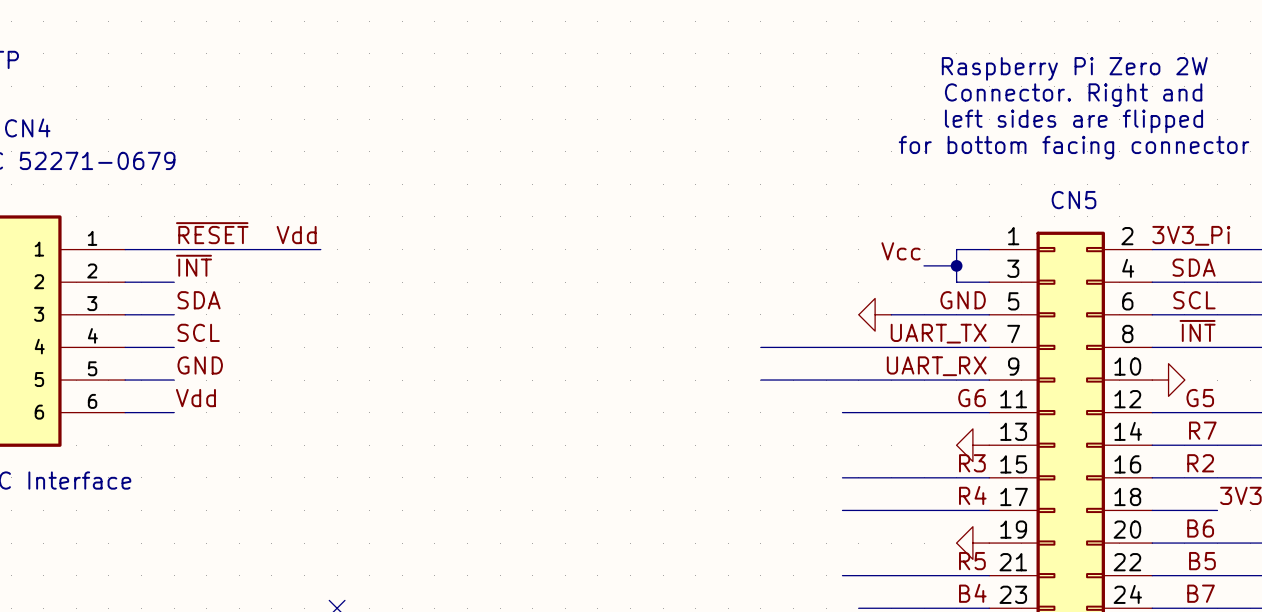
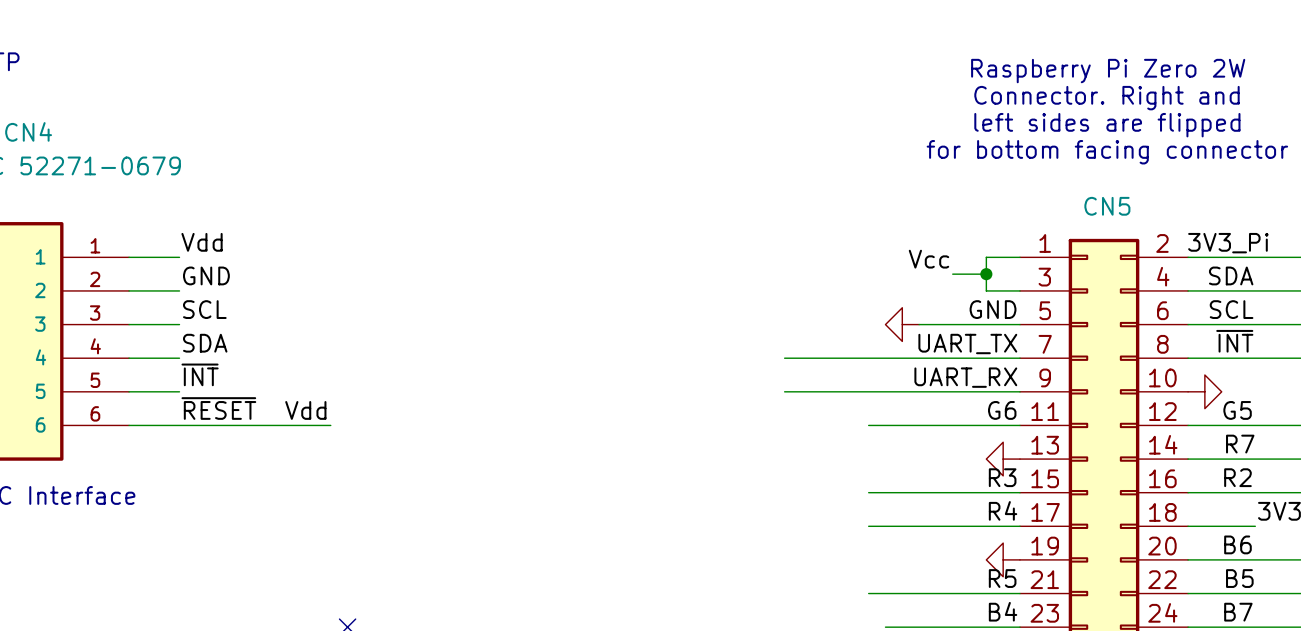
label: ~{RESET} (212, 233) -> Vdd (202, 242)
label position: Vdd (296, 235) -> Vdd (305, 410)
wire: (174, 249) (320, 249) -> (179, 425) (330, 425)
label: ~{INT} (194, 265) -> GND (206, 275)
label: SDA (199, 300) -> SCL (204, 309)
label: SCL (198, 332) -> SDA (205, 343)
label: GND (200, 365) -> ~{INT} (200, 374)
label: Vdd (195, 398) -> ~{RESET} (218, 408)

